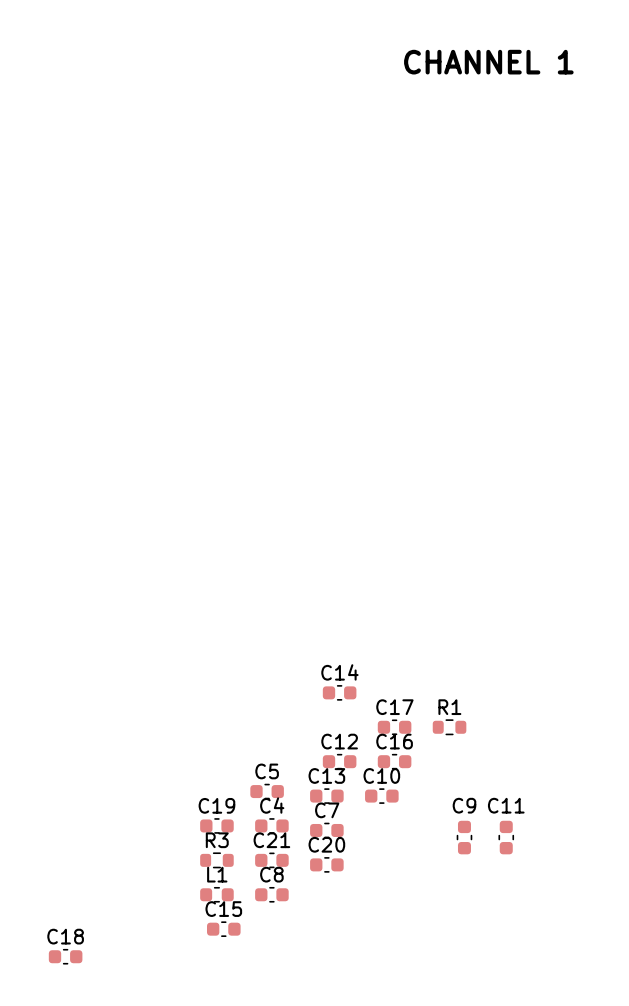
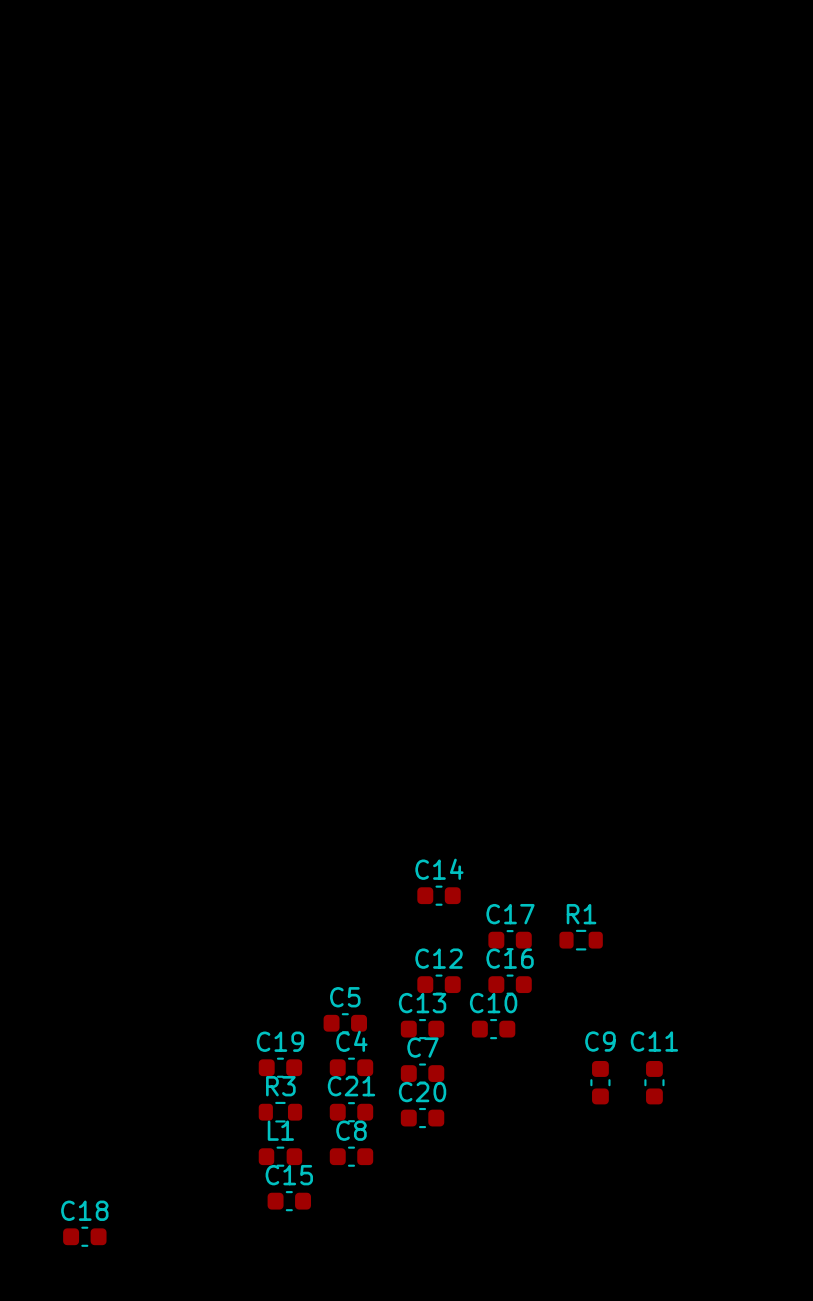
text: CHANNEL 1 (488, 62) -> none

